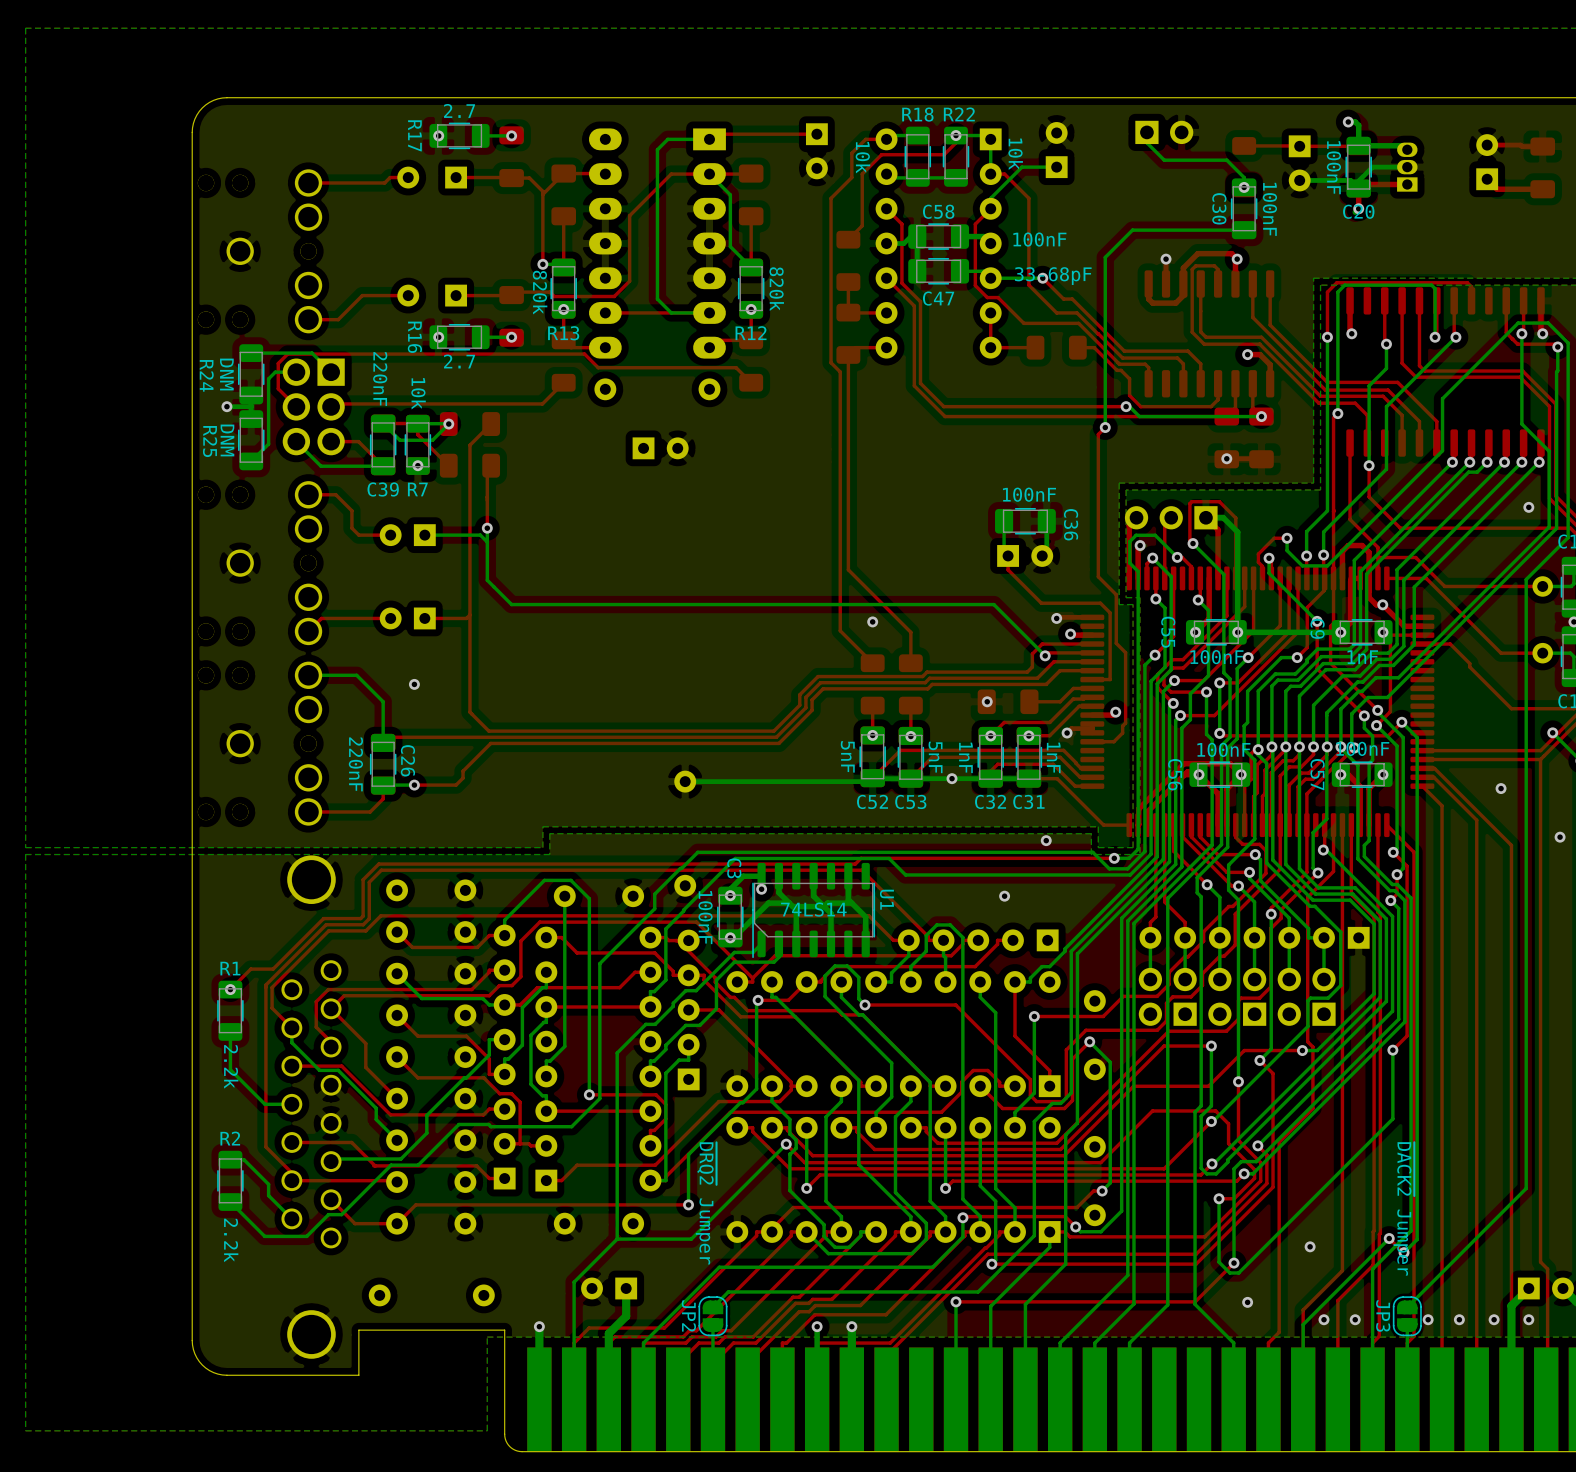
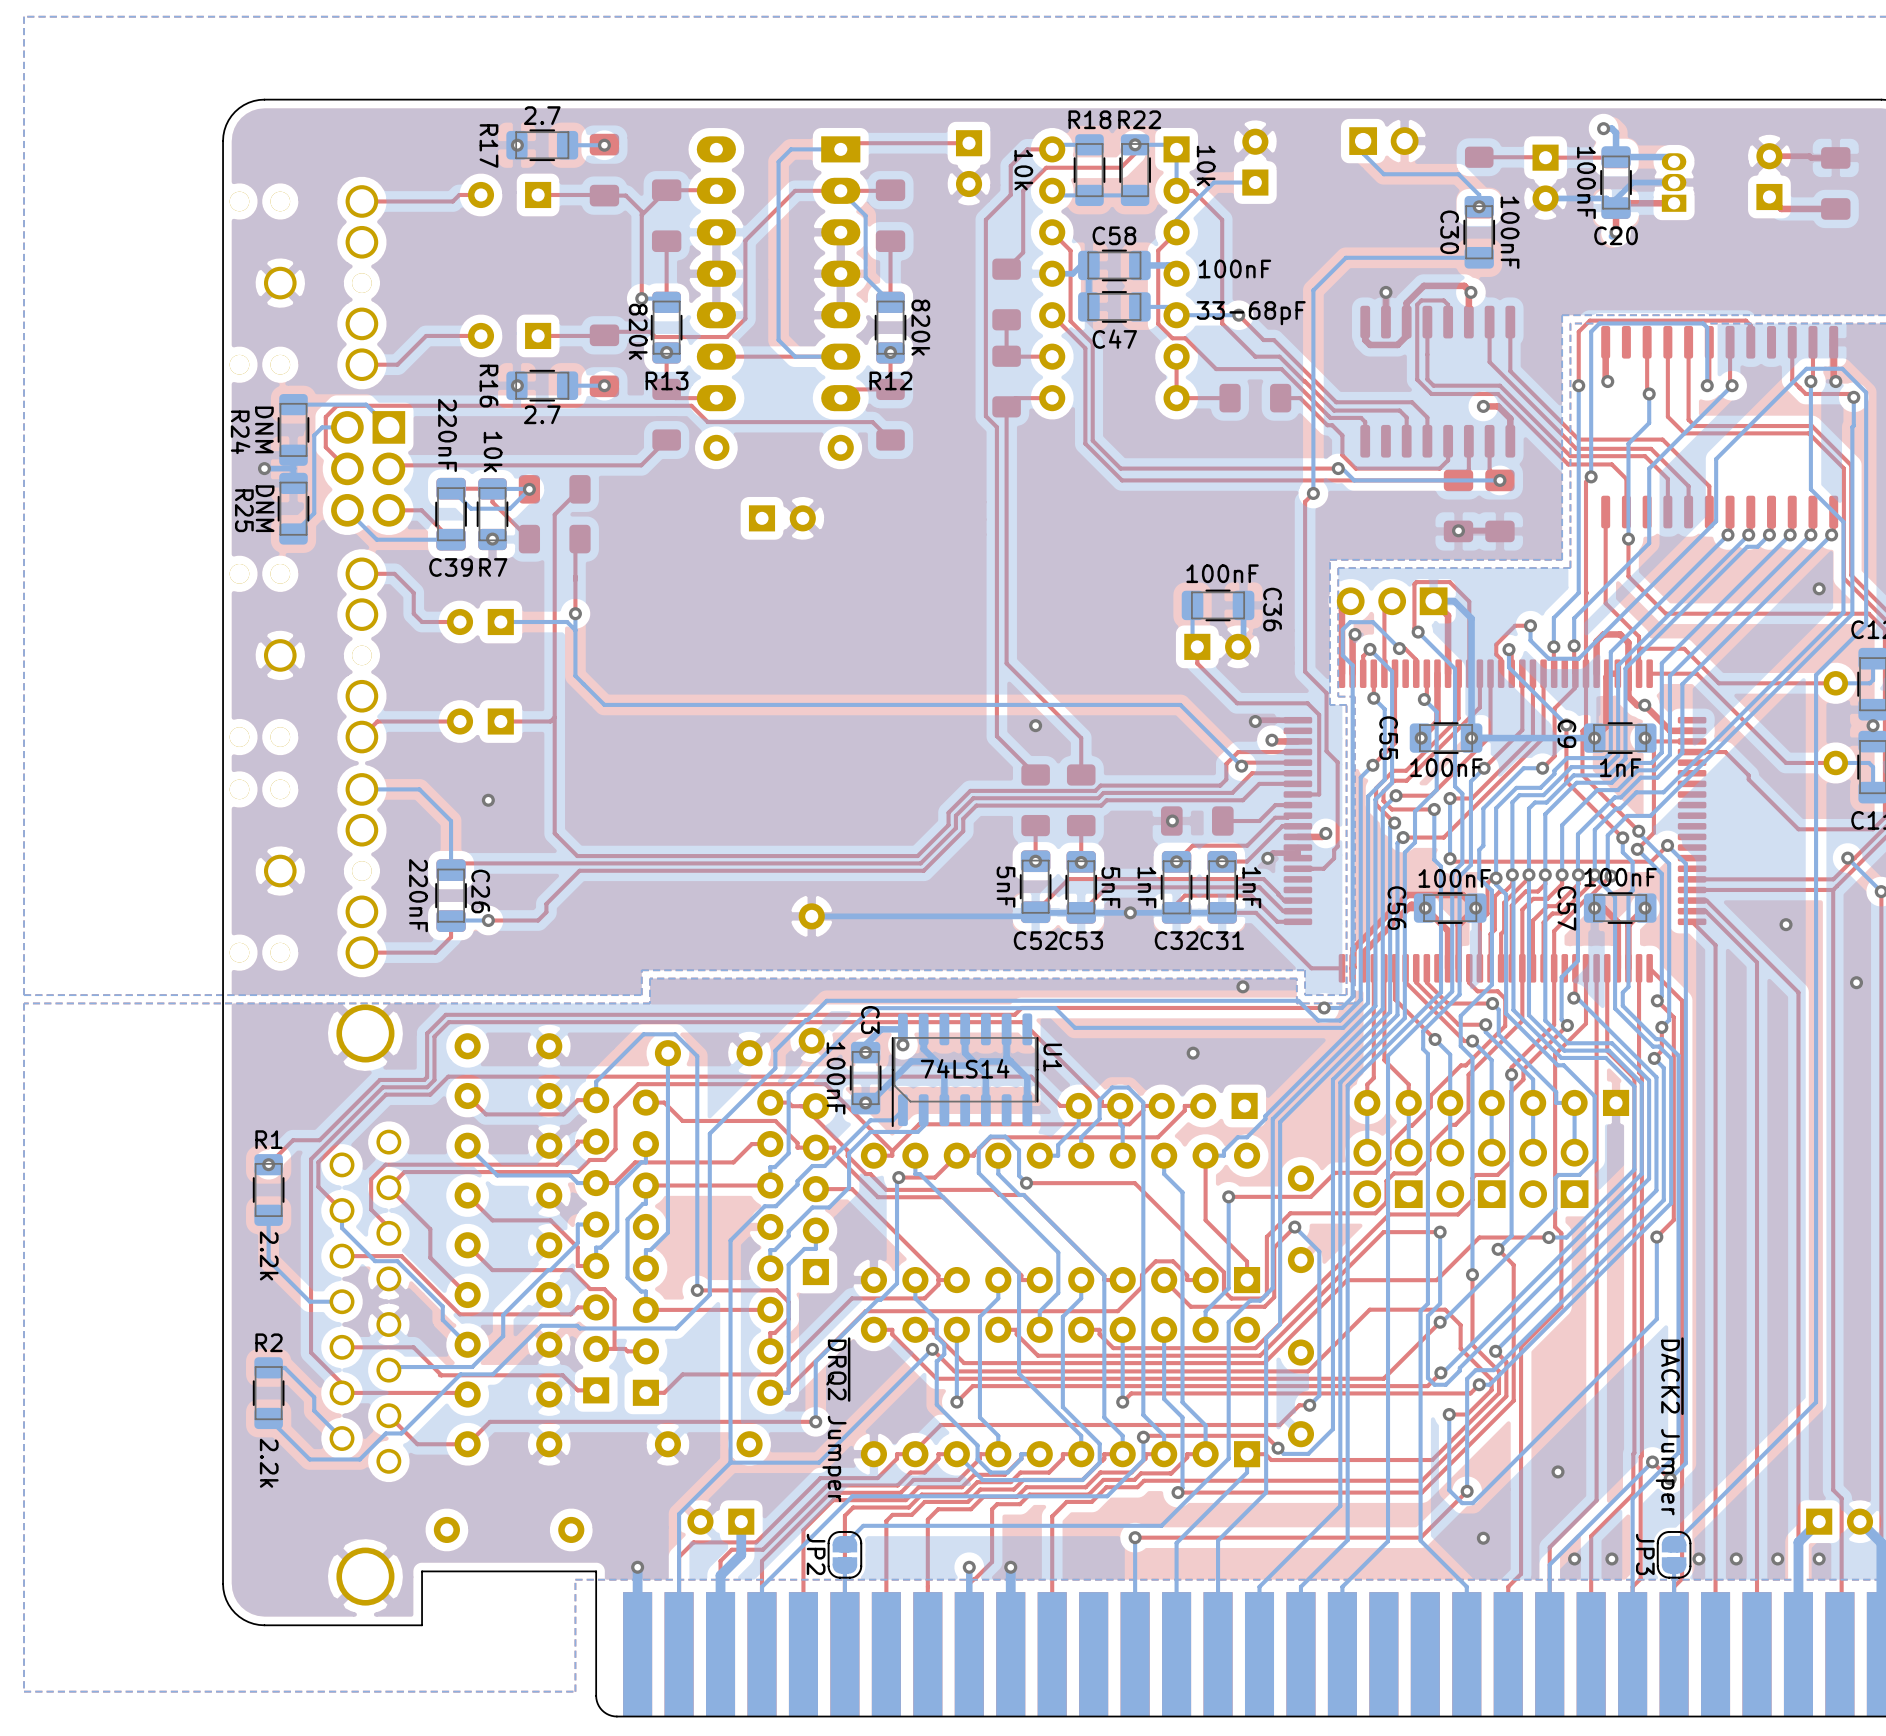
top track: (860, 1235) (799, 1297) (793, 1297) (753, 1336) (724, 1336) (718, 1343) (698, 1343) (678, 1363) -> (1021, 1458) (1004, 1474) (974, 1474) (961, 1487) (918, 1487) (905, 1500) (833, 1500) (803, 1530) (803, 1611)
top track: (964, 1235) (885, 1314) (814, 1314) (786, 1343) (782, 1343) -> (1144, 1459) (1131, 1472) (1100, 1472) (1085, 1487) (1026, 1487) (1016, 1496) (983, 1496) (970, 1509) (938, 1509) (927, 1519) (927, 1586)
top track: (928, 1237) (860, 1305) (815, 1305) (809, 1311) (799, 1311) (747, 1363) -> (1102, 1460) (1082, 1479) (1023, 1479) (1013, 1489) (980, 1489) (967, 1501) (924, 1501) (911, 1514) (892, 1514) (886, 1521) (886, 1610)
top track: (779, 1247) (696, 1330) (689, 1330) (683, 1336) (614, 1336) (608, 1343) -> (924, 1472) (910, 1472) (897, 1485) (827, 1485) (762, 1549) (731, 1549) (720, 1561) (720, 1586)
top track: (883, 1247) (831, 1299) (812, 1299) (808, 1303) (795, 1303) (755, 1343) (733, 1343) (712, 1363) -> (1049, 1472) (1020, 1472) (1010, 1482) (977, 1482) (964, 1494) (921, 1494) (908, 1507) (853, 1507) (844, 1515) (844, 1611)
top track: (985, 1248) (890, 1343) (817, 1343) -> (1170, 1473) (1141, 1473) (1134, 1479) (1103, 1479) (1088, 1494) (1029, 1494) (1019, 1504) (997, 1504) (992, 1509) (992, 1561) (969, 1583) (969, 1586)
top track: (740, 1252) (664, 1328) (589, 1328) (574, 1343) -> (877, 1478) (820, 1478) (756, 1542) (693, 1542) (679, 1556) (679, 1586)
top track: (808, 1253) (731, 1330) (722, 1330) (716, 1336) (692, 1336) (685, 1343) (643, 1343) -> (958, 1479) (913, 1479) (900, 1492) (830, 1492) (761, 1561) (761, 1586)
top track: (987, 1254) (886, 1355) -> (1173, 1480) (1144, 1480) (1137, 1487) (1106, 1487) (1091, 1501) (1066, 1501) (1052, 1516) (1052, 1601)

